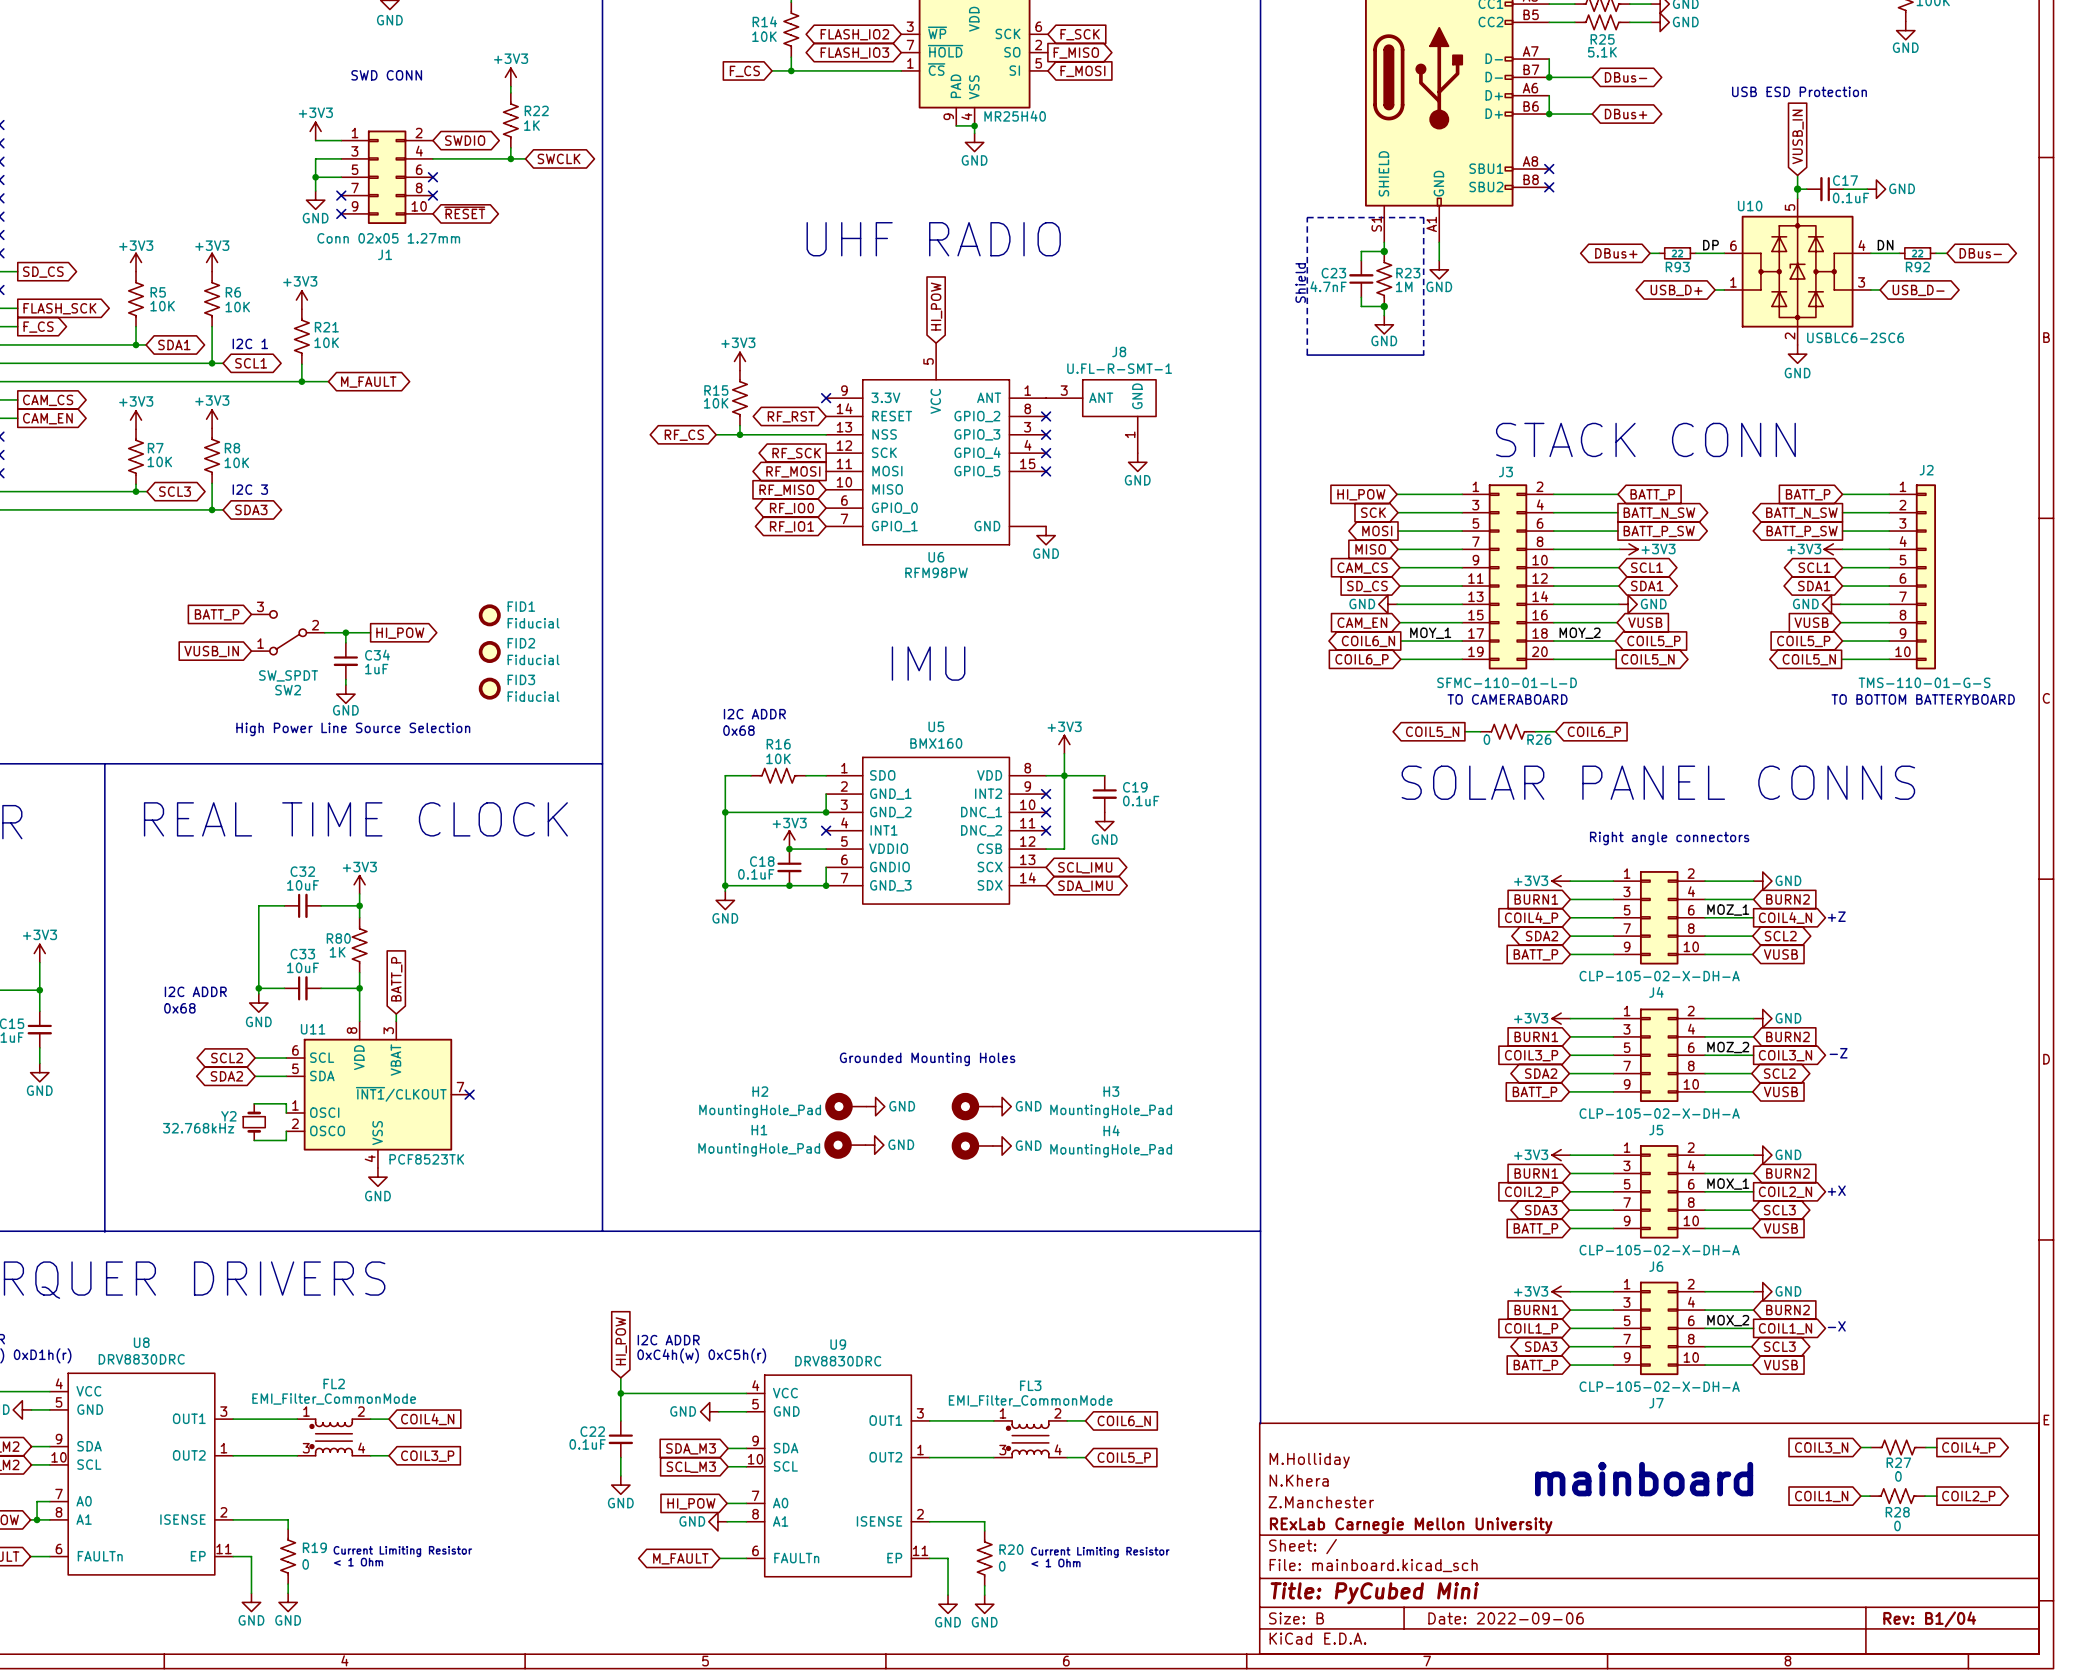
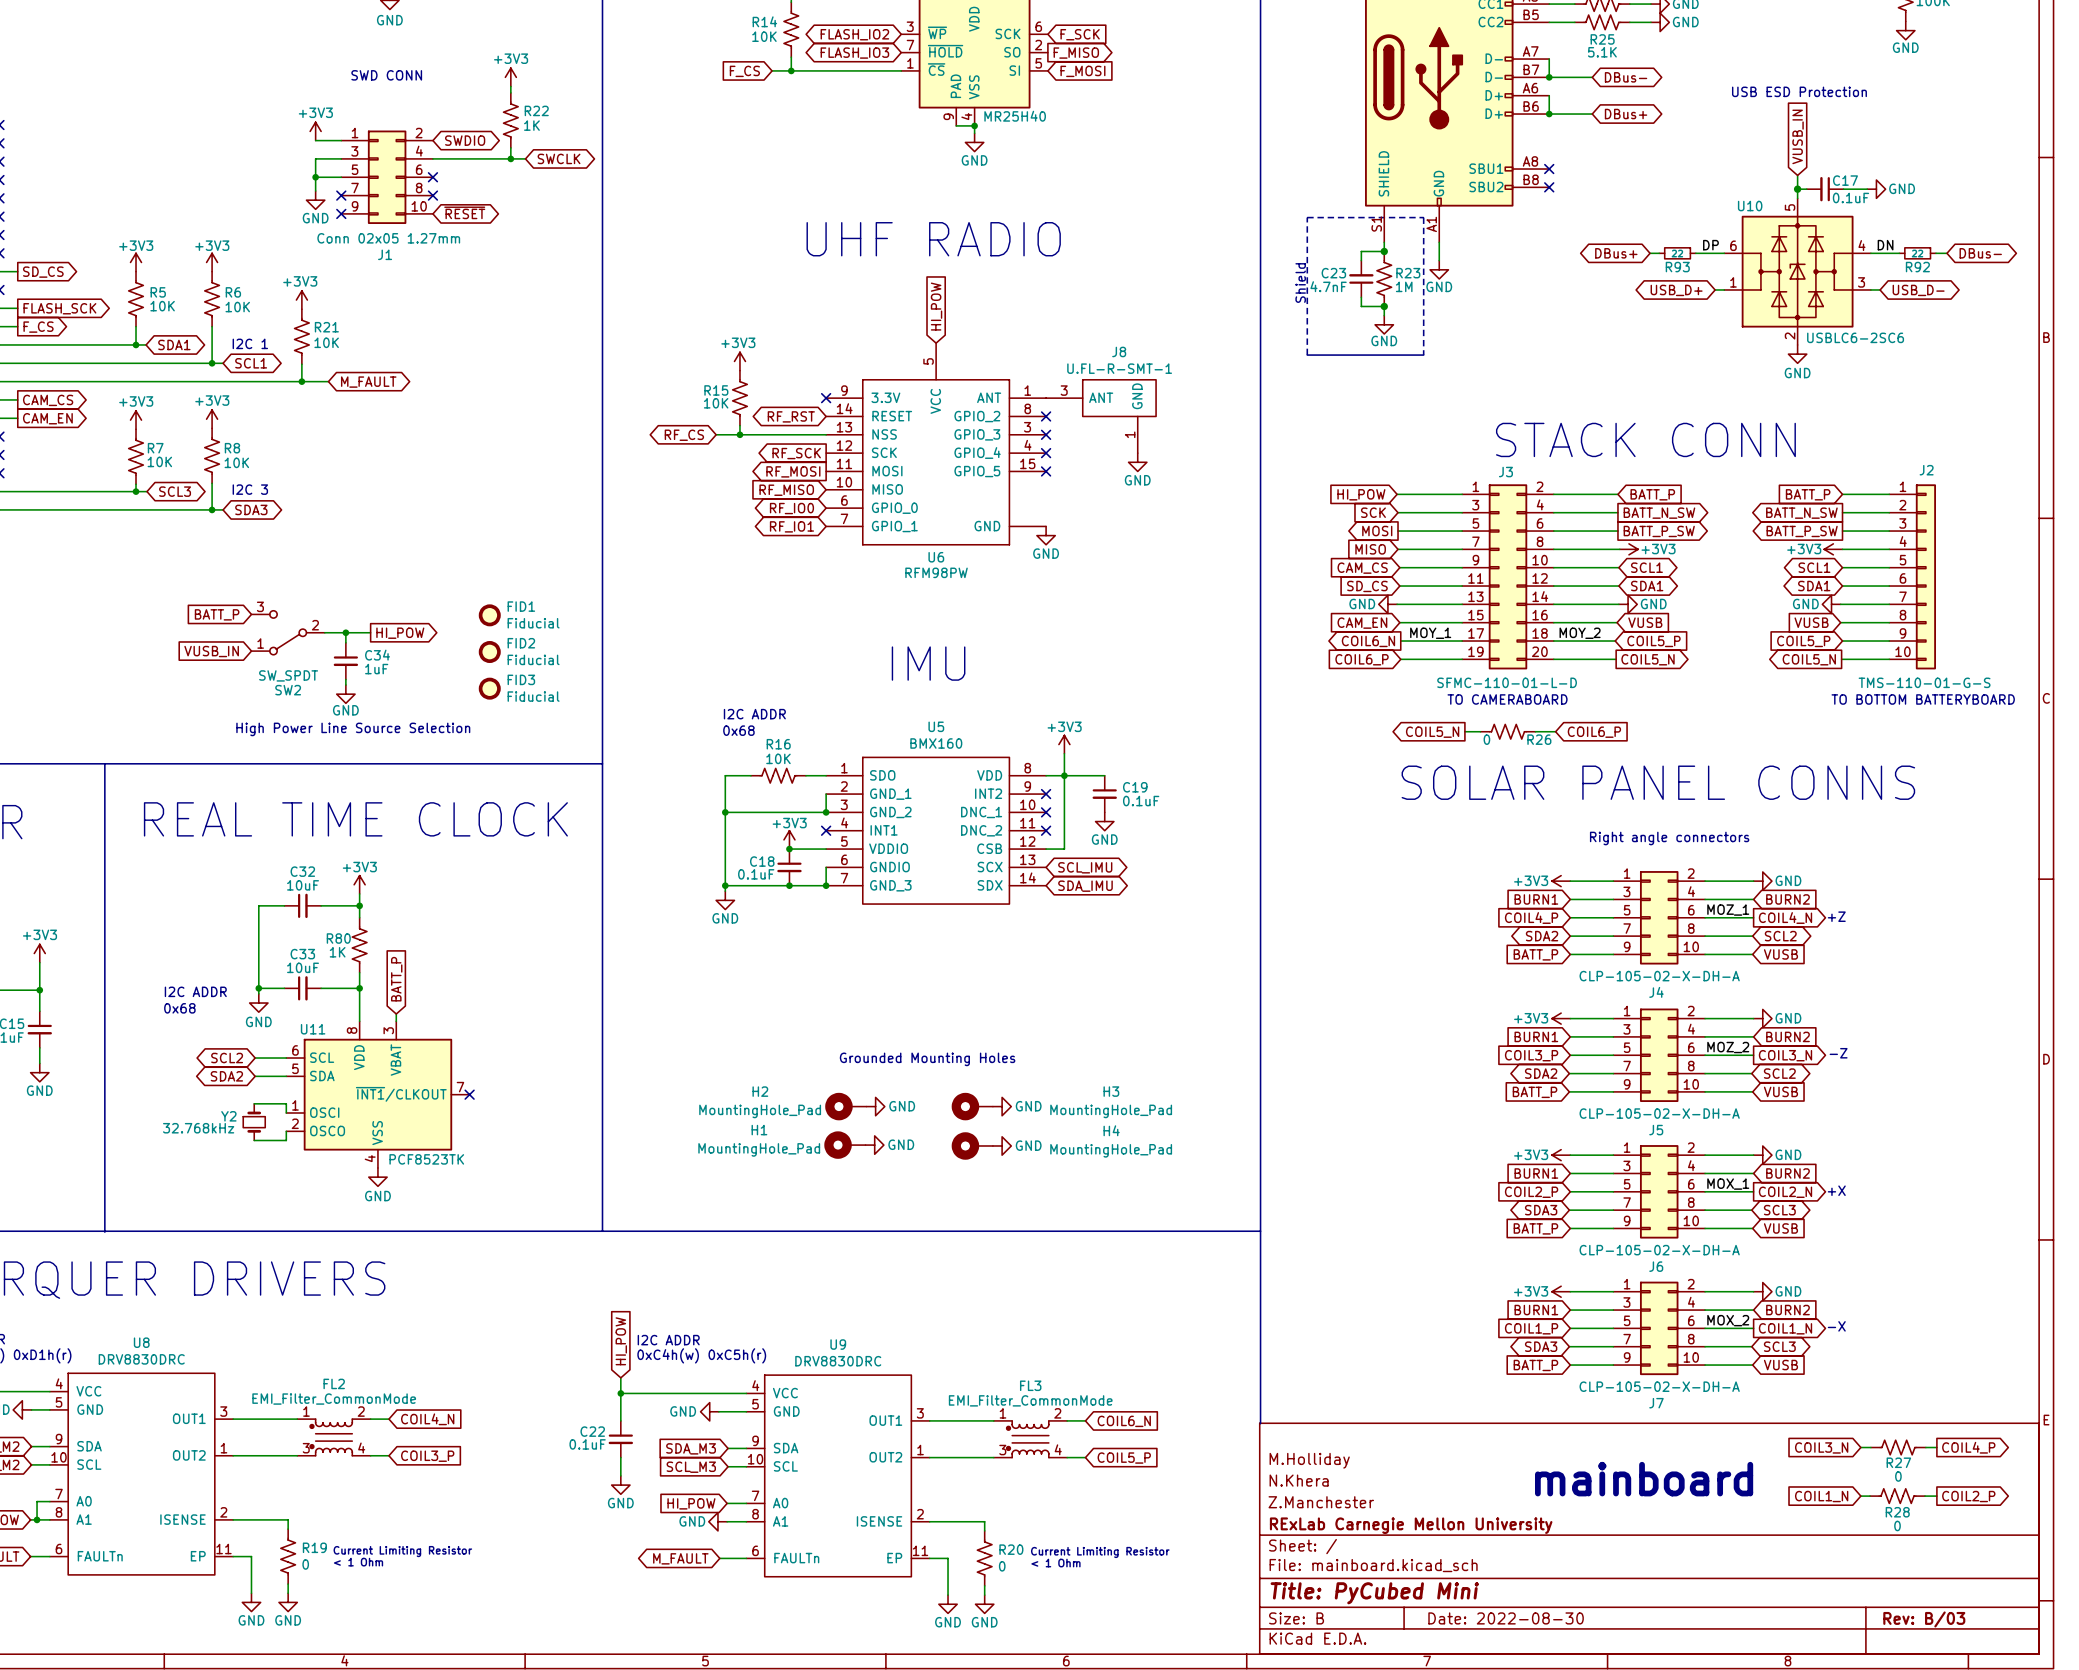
title block: Date: 2022-09-06 (1506, 1618) -> Date: 2022-08-30 (1506, 1618)
title block: Rev: B1/04 (1929, 1619) -> Rev: B/03 (1924, 1619)

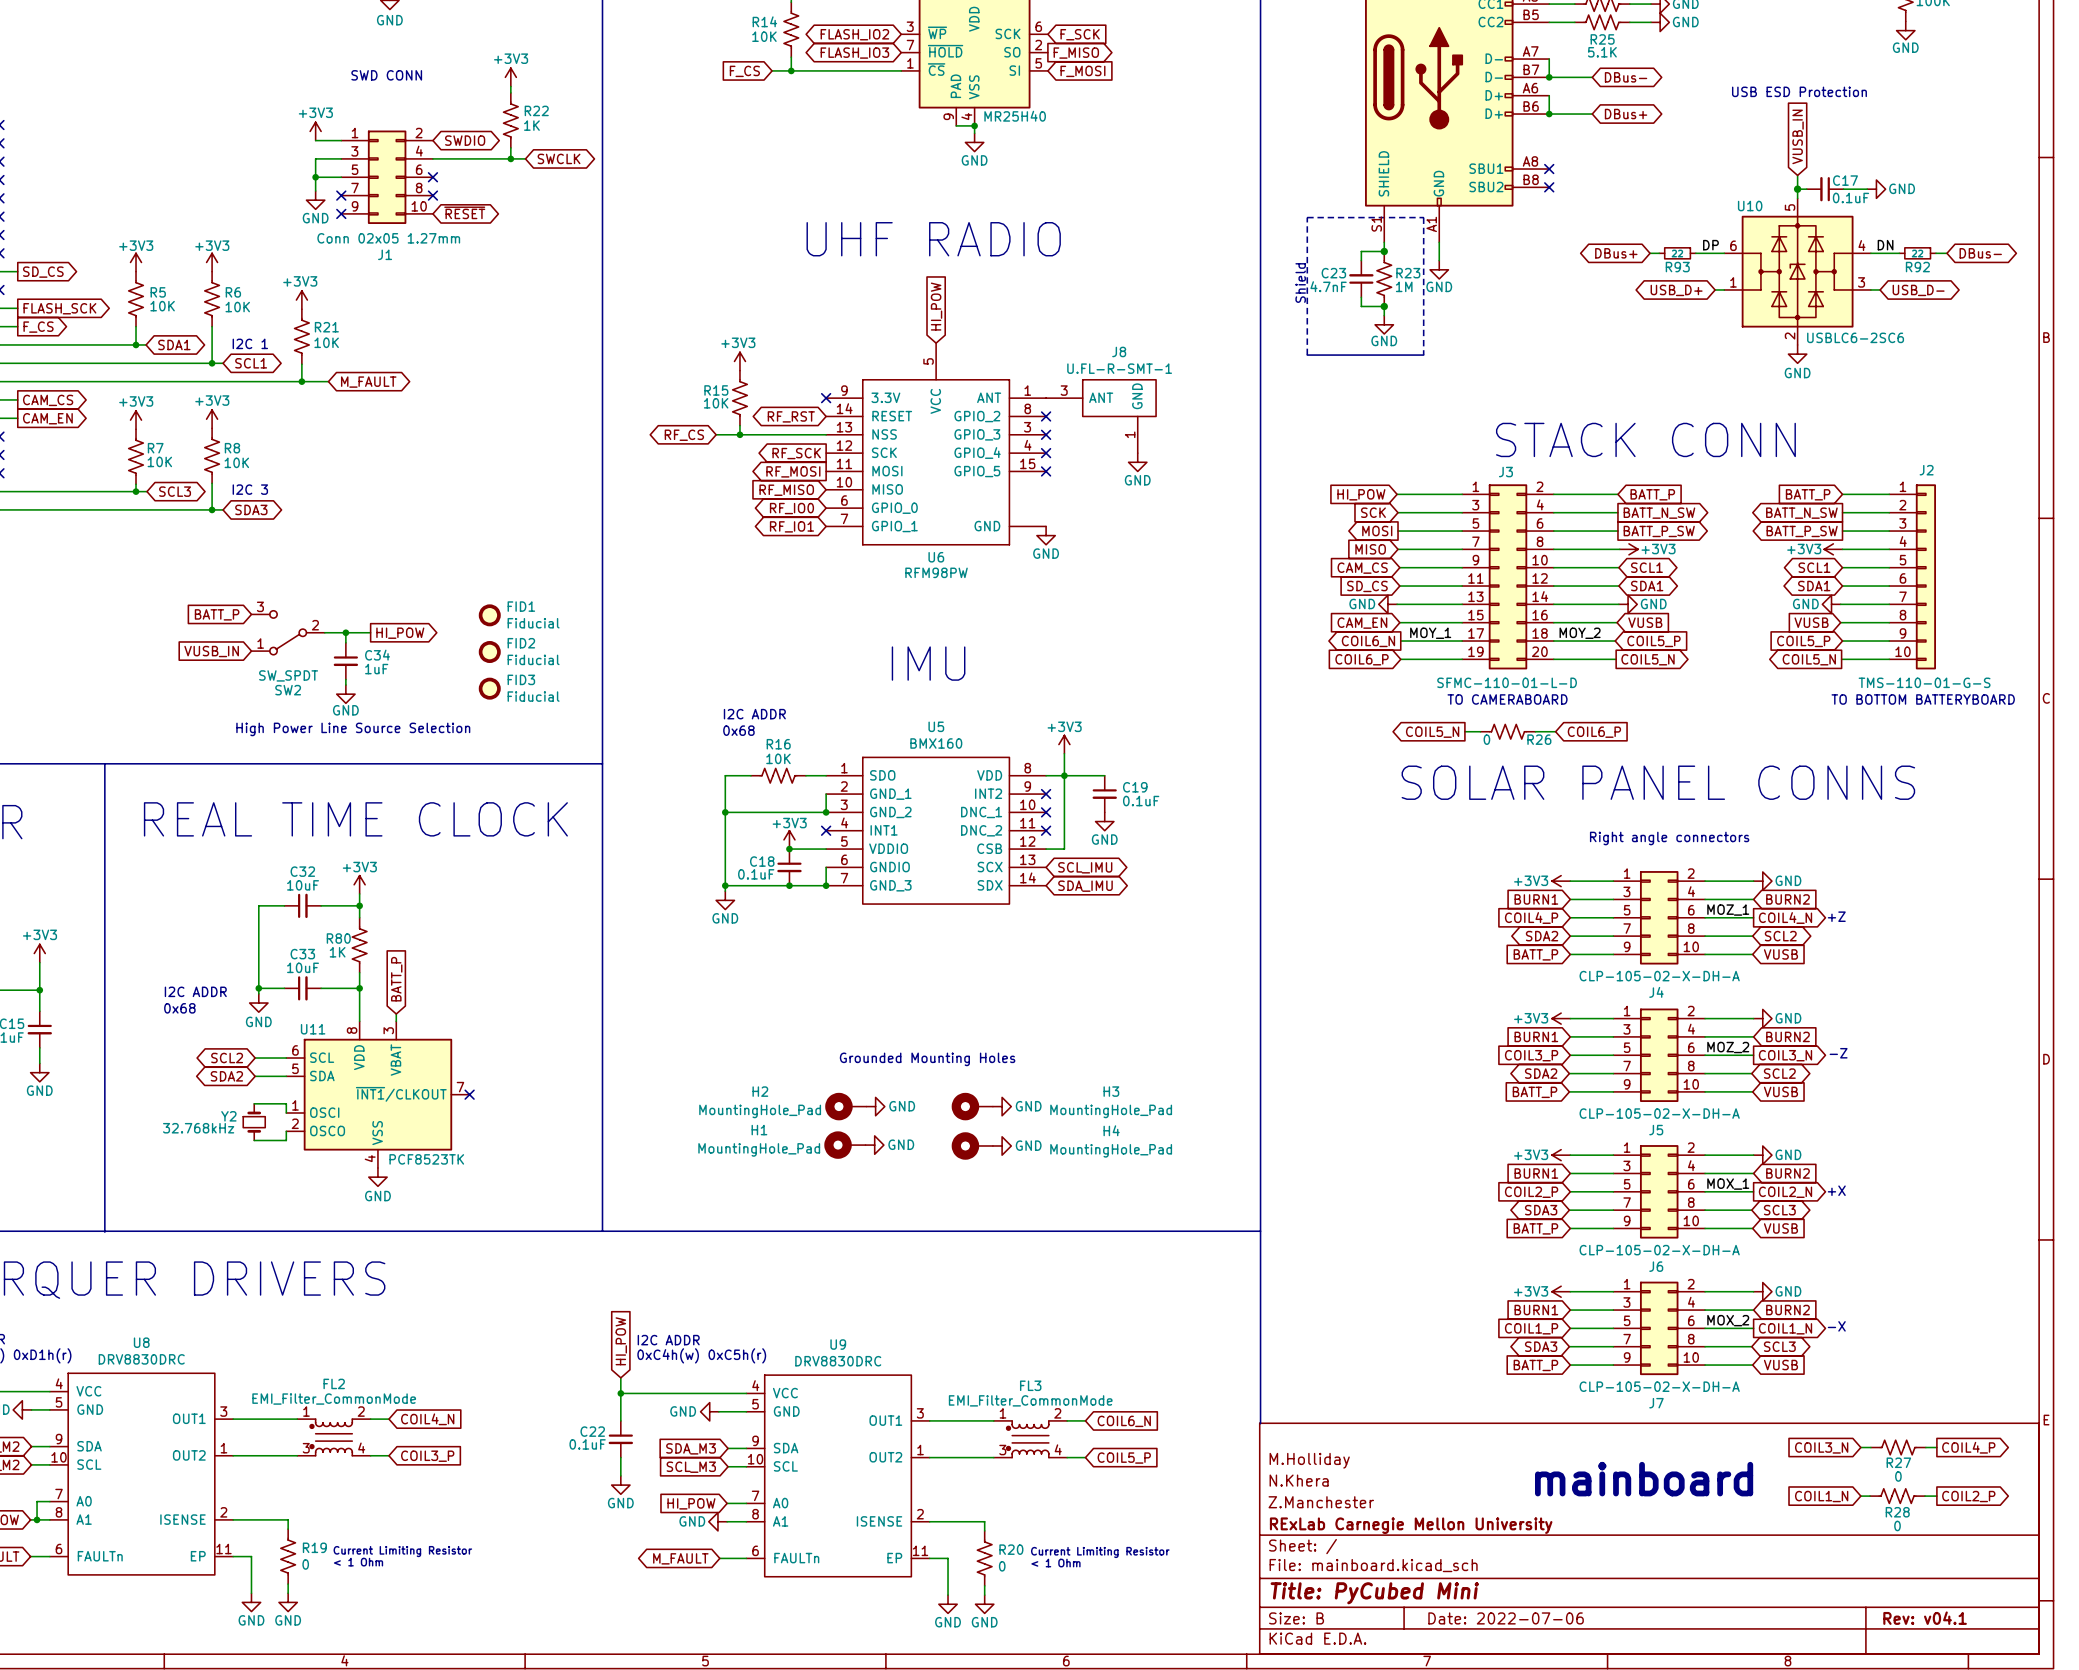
title block: Date: 2022-08-30 (1506, 1618) -> Date: 2022-07-06 (1506, 1618)
title block: Rev: B/03 (1924, 1619) -> Rev: v04.1 (1925, 1618)

